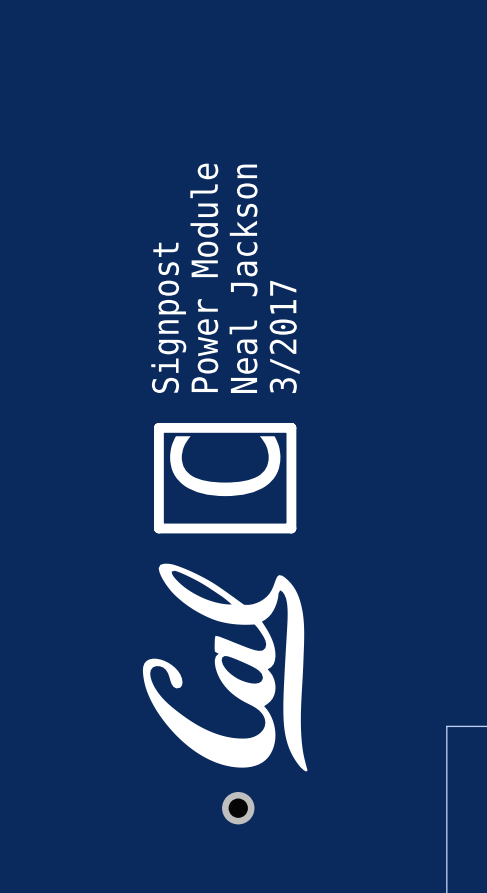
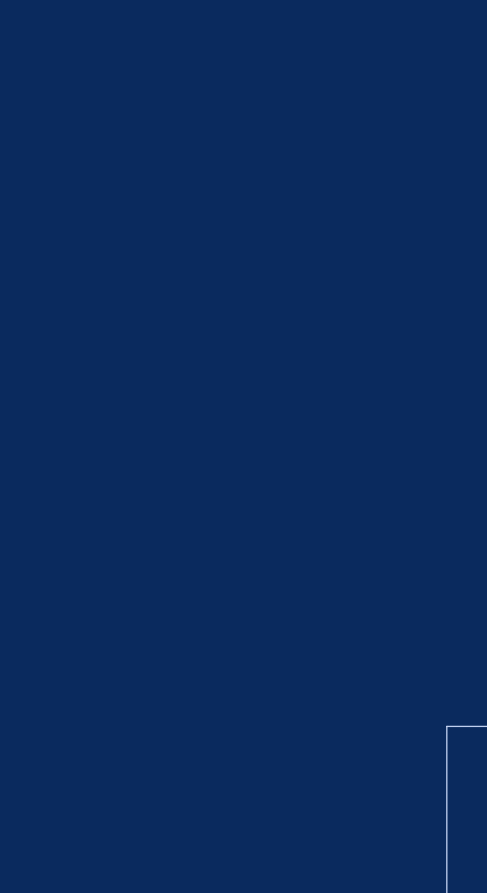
text: Power Module (204, 277) -> none
text: Neal Jackson (243, 278) -> none
text: Signpost (168, 317) -> none
text: 3/2017 (284, 336) -> none
line: (158, 427) (158, 528) (291, 528) (291, 427) (158, 427) -> none
text: C (225, 466) -> none
drawing: [142, 563, 308, 772] -> none
via: (238, 808) -> none

